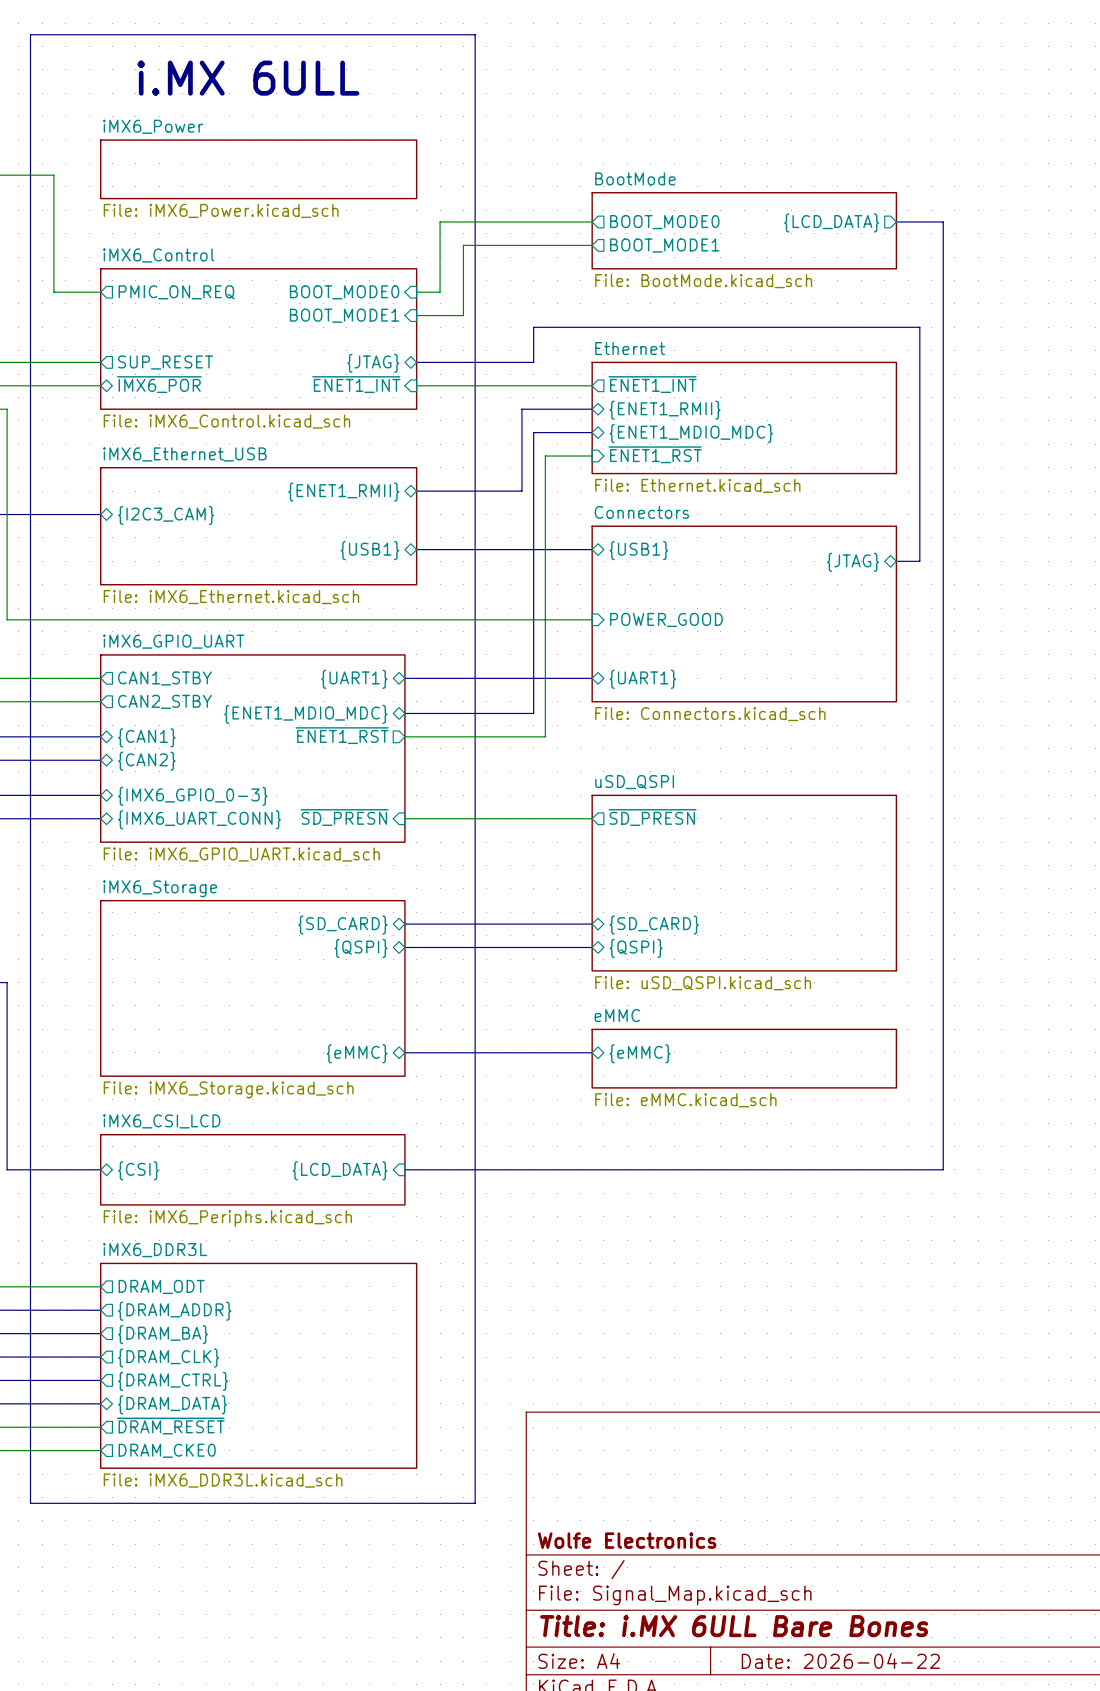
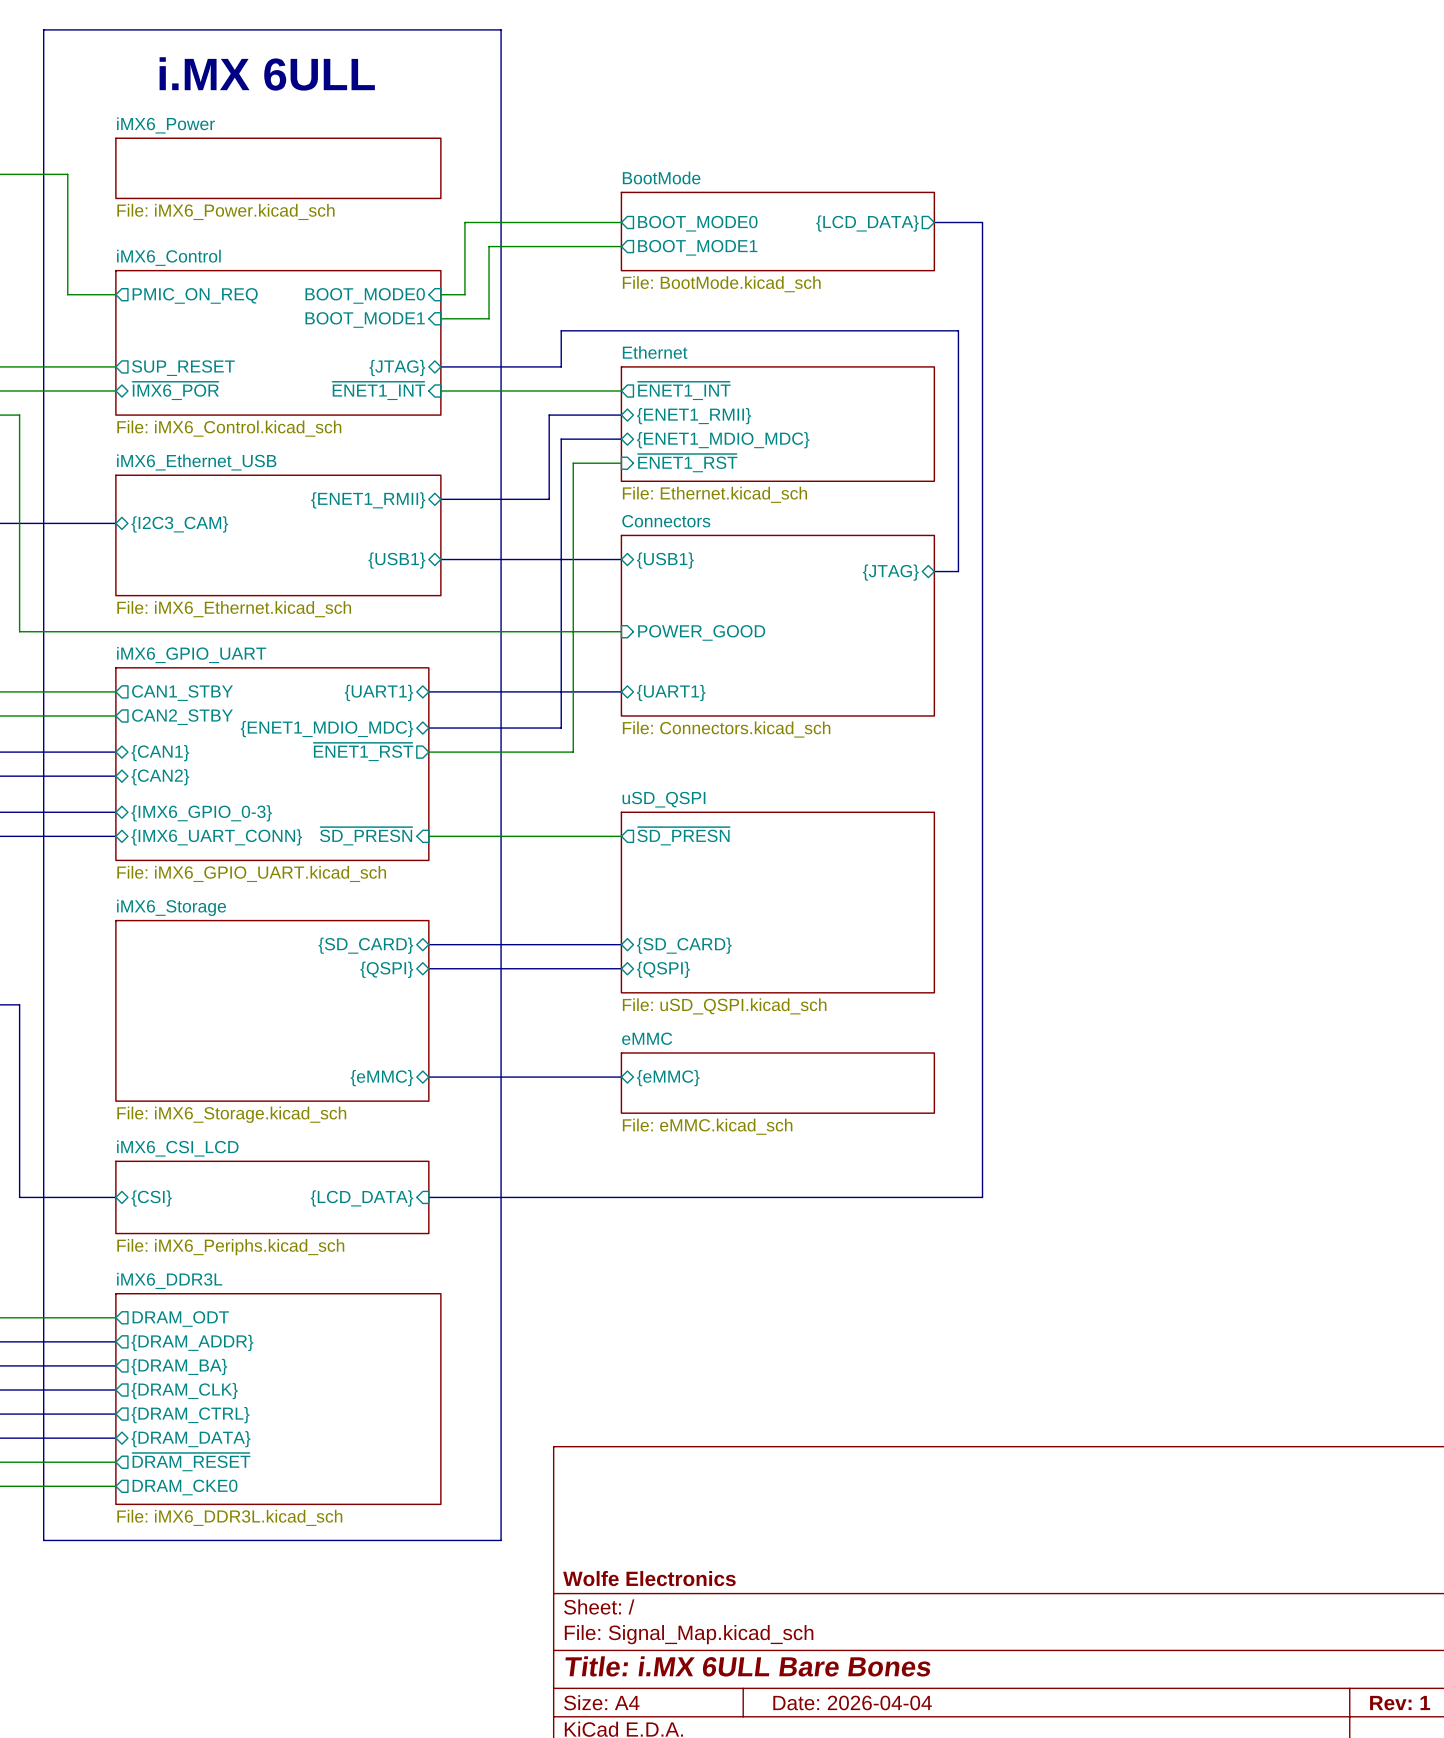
title block: Date: 2026-04-22 (840, 1660) -> Date: 2026-04-04 (852, 1702)

